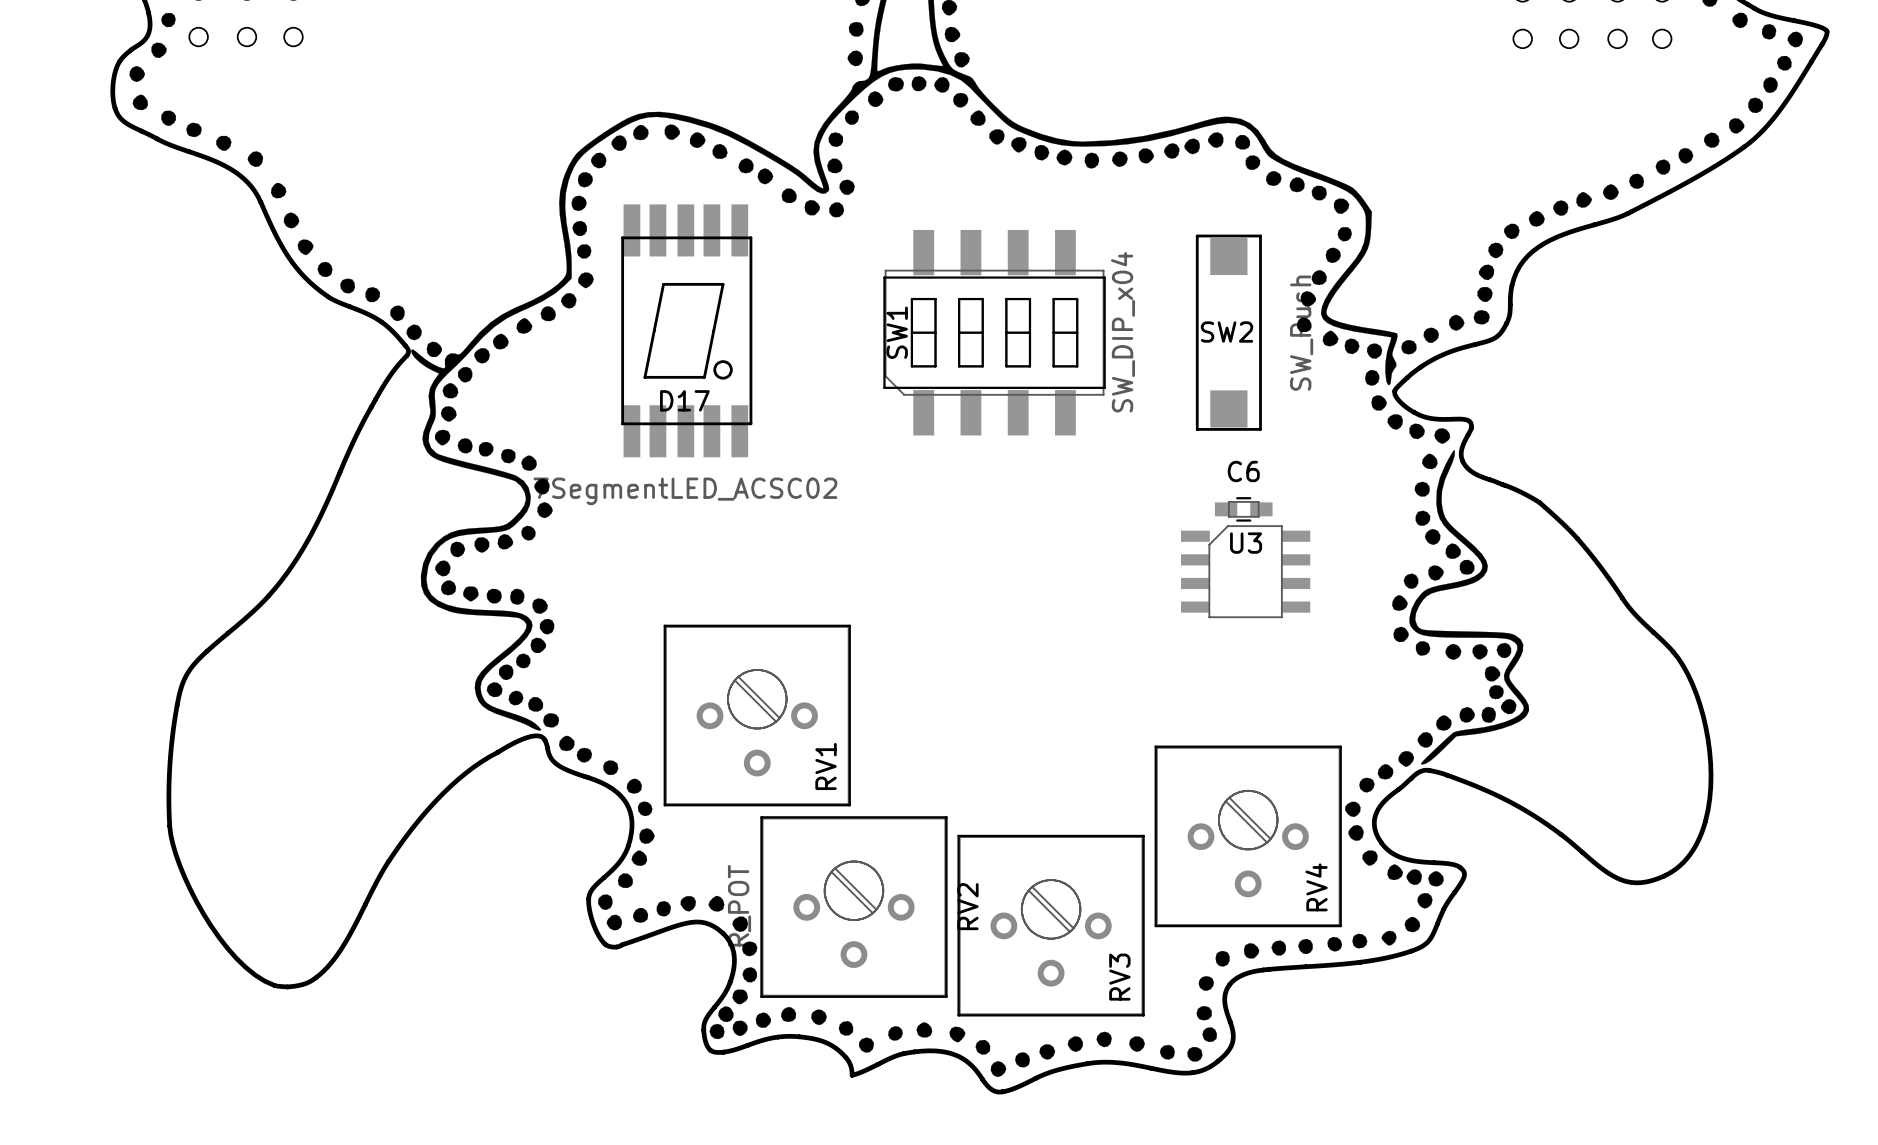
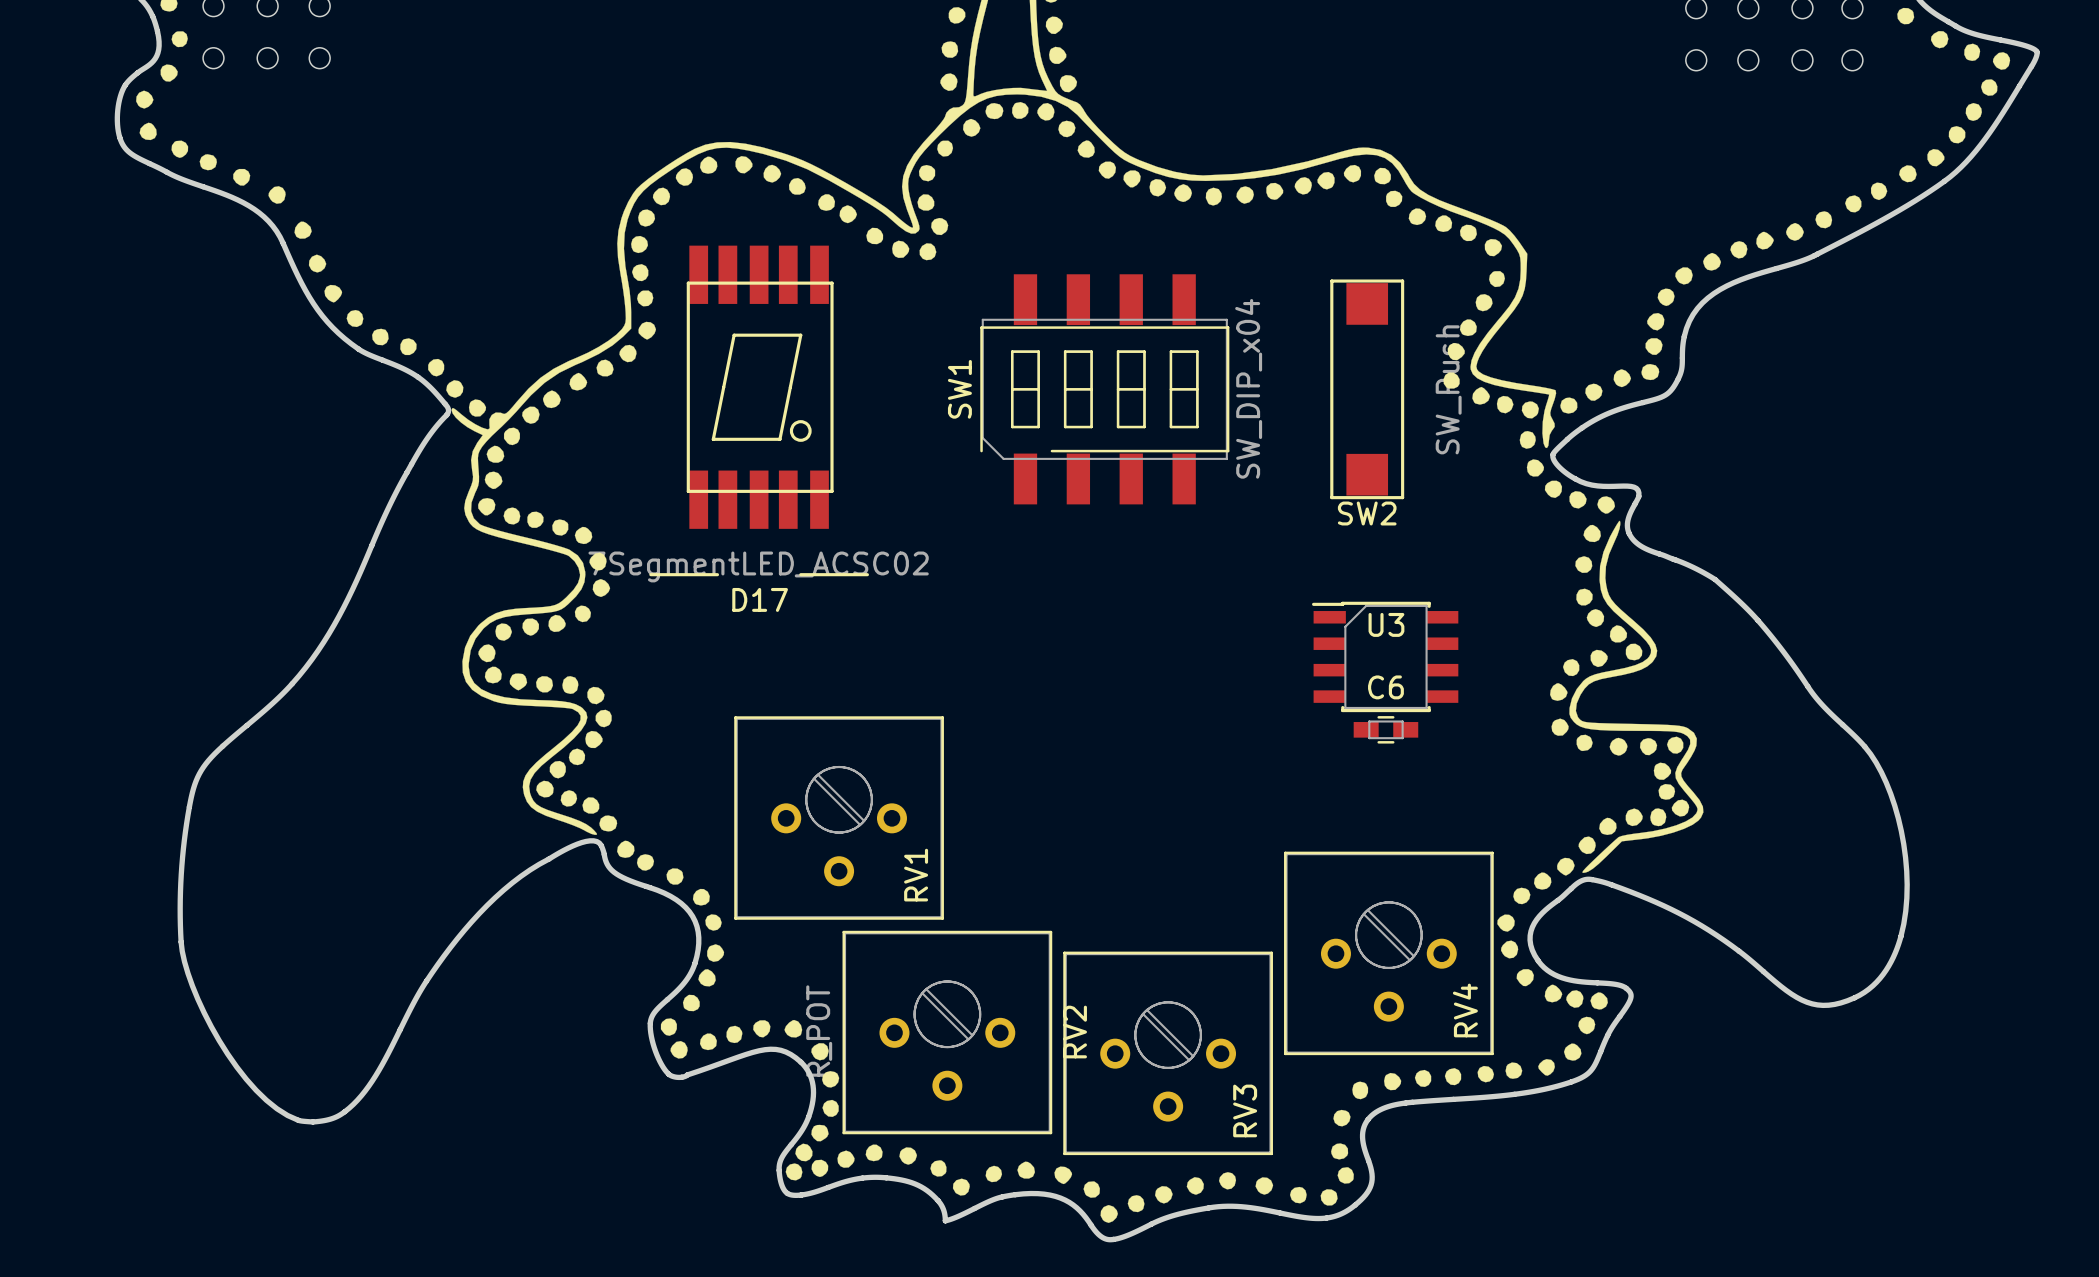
D17 footprint: [621, 204, 753, 458] -> [649, 245, 869, 577]
SW1 footprint: [883, 229, 1106, 436] -> [980, 274, 1230, 505]
SW2 name position: SW2 (1227, 332) -> SW2 (1367, 513)
D17 name position: D17 (684, 400) -> D17 (760, 599)
C6 position: (1243, 509) -> (1385, 729)
U3 footprint: [1180, 525, 1311, 619] -> [1312, 601, 1459, 713]

